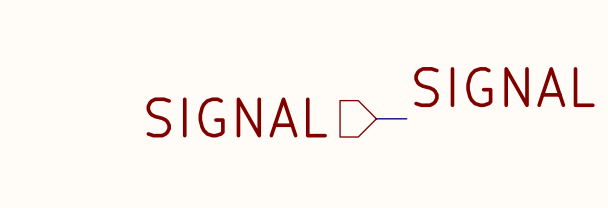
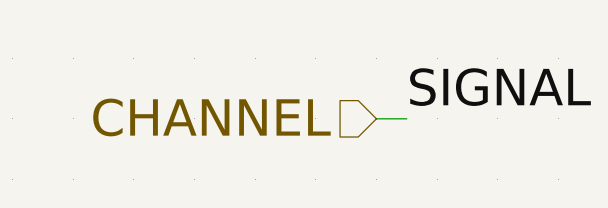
hierarchical label: SIGNAL (236, 117) -> CHANNEL (211, 117)

